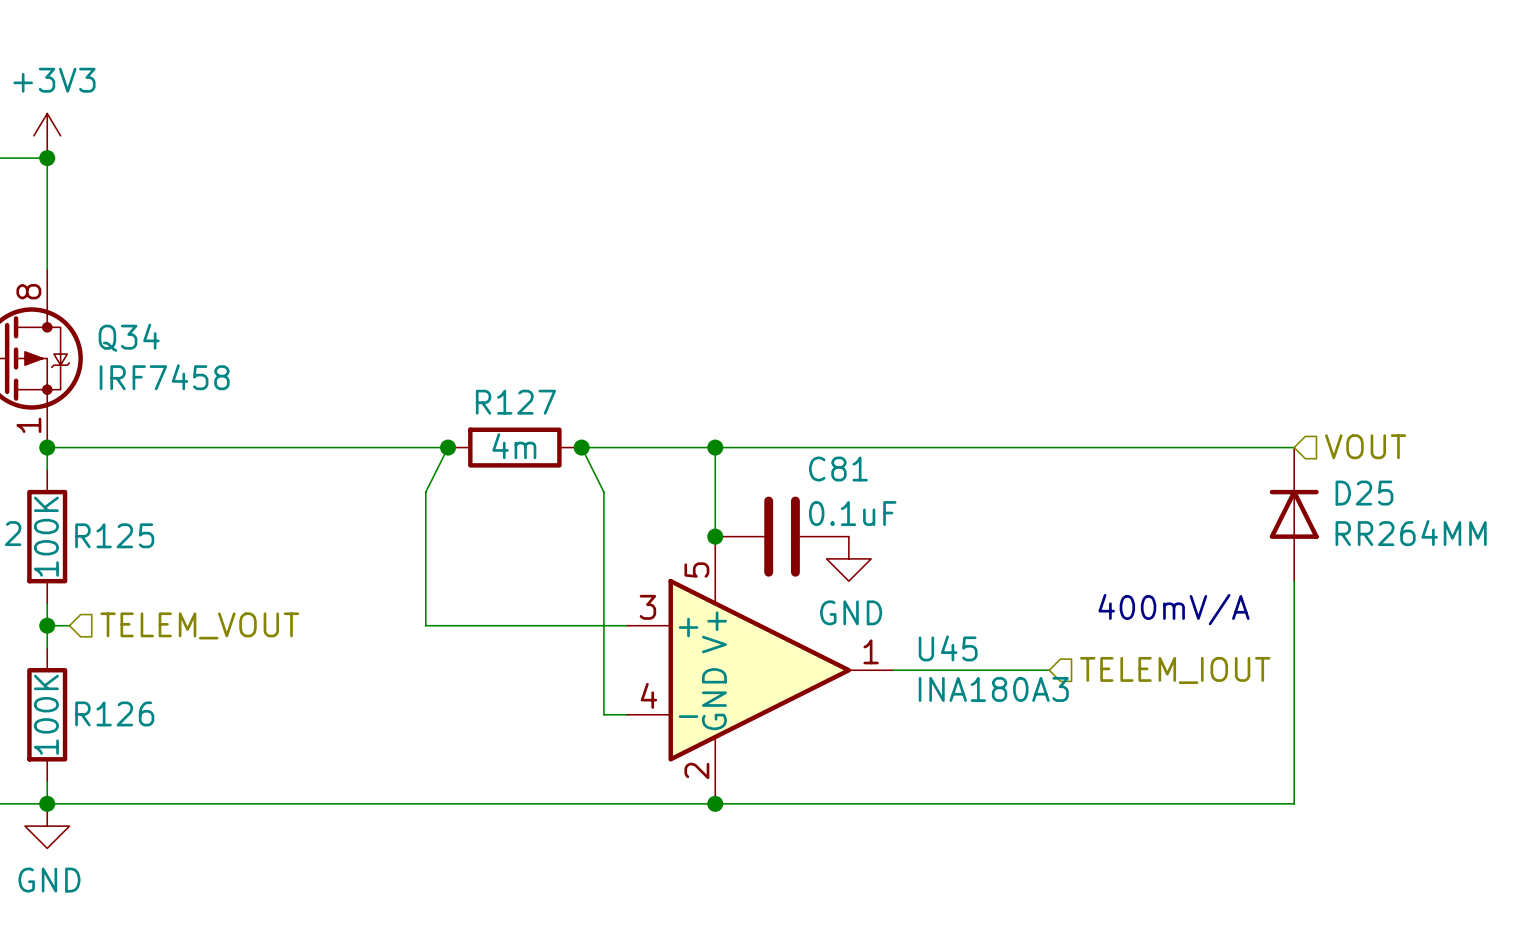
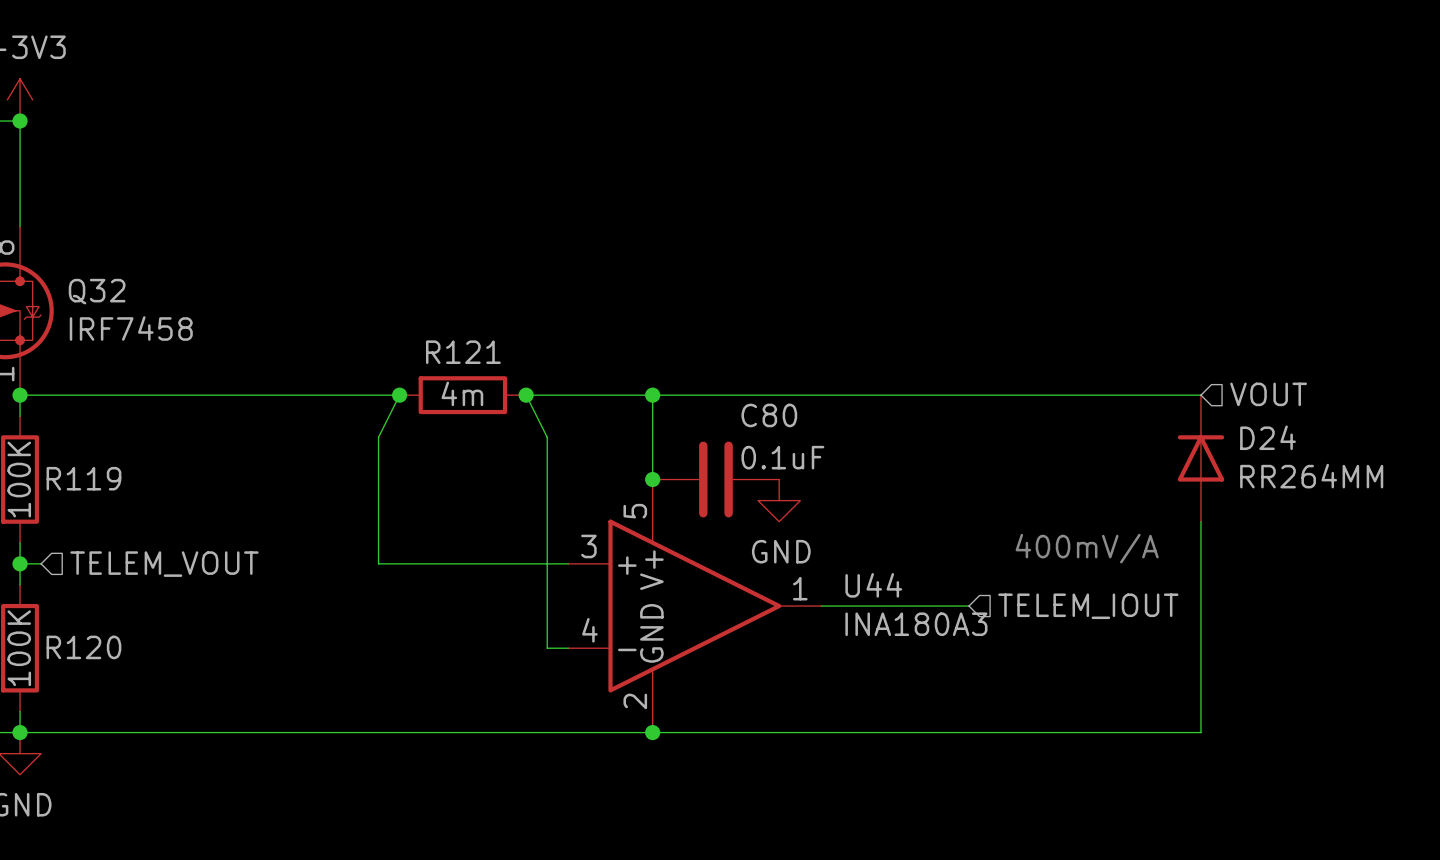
Q34 name: Q34 (129, 337) -> Q32 (97, 291)
R127 name: R127 (515, 402) -> R121 (463, 352)
C81 name: C81 (838, 469) -> C80 (769, 415)
D25 name: D25 (1364, 493) -> D24 (1268, 437)
R125 name: R125 (114, 535) -> R119 (83, 478)
U45 name: U45 (948, 648) -> U44 (873, 585)
R126 name: R126 (114, 713) -> R120 (83, 647)

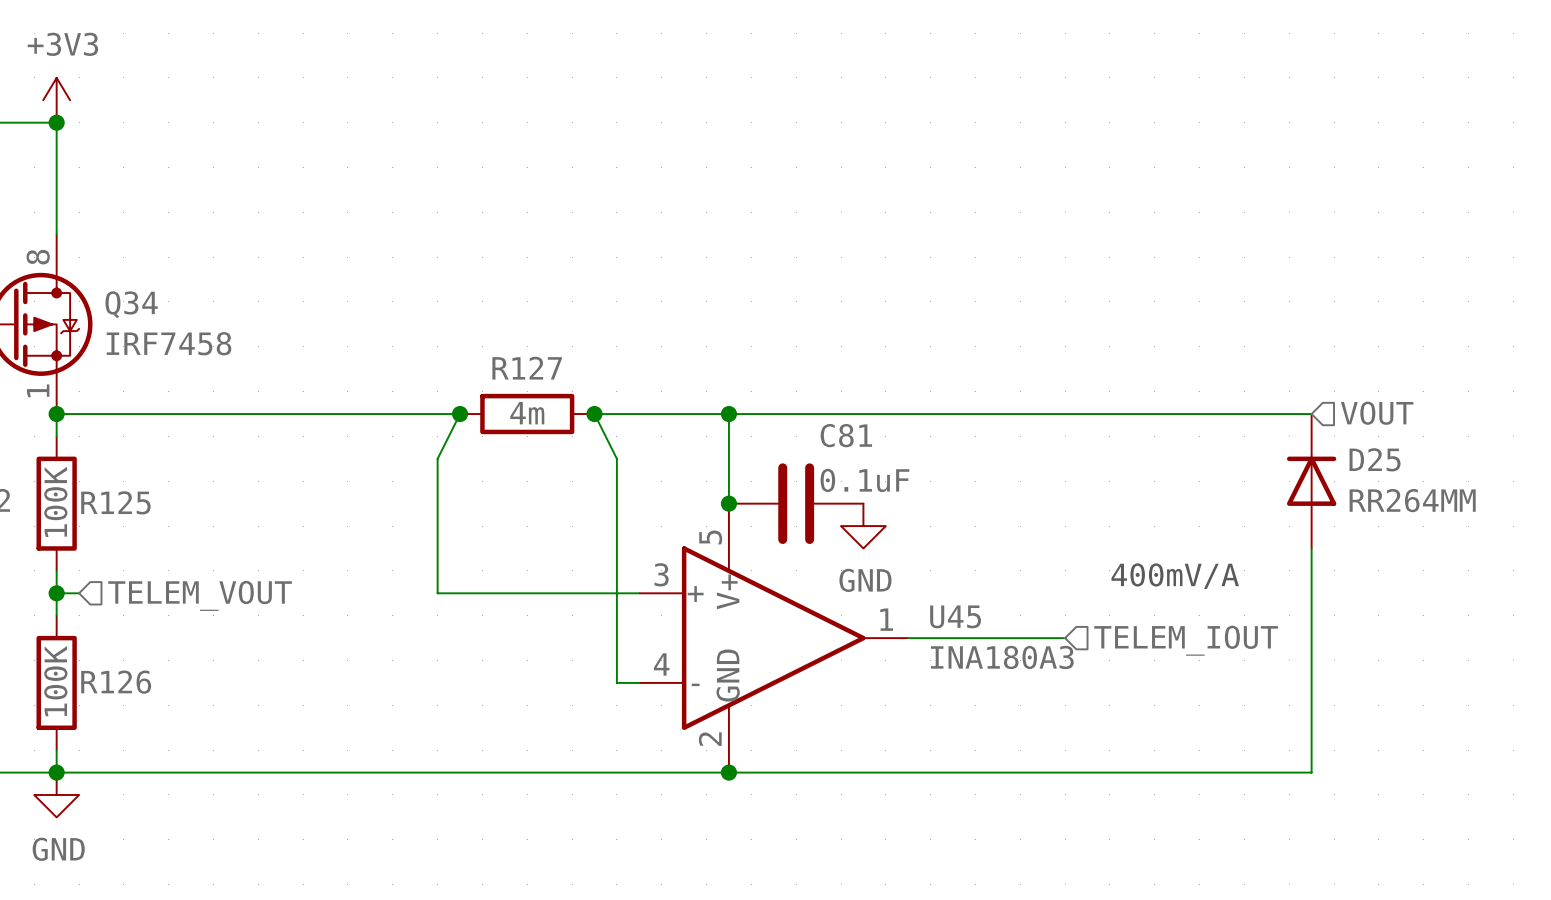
Q32 name: Q32 (97, 291) -> Q34 (131, 304)
R121 name: R121 (463, 352) -> R127 (527, 368)
C80 name: C80 (769, 415) -> C81 (846, 435)
D24 name: D24 (1268, 437) -> D25 (1375, 459)
R119 name: R119 (83, 478) -> R125 (115, 502)
U44 name: U44 (873, 585) -> U45 (955, 616)
R120 name: R120 (83, 647) -> R126 (116, 682)

